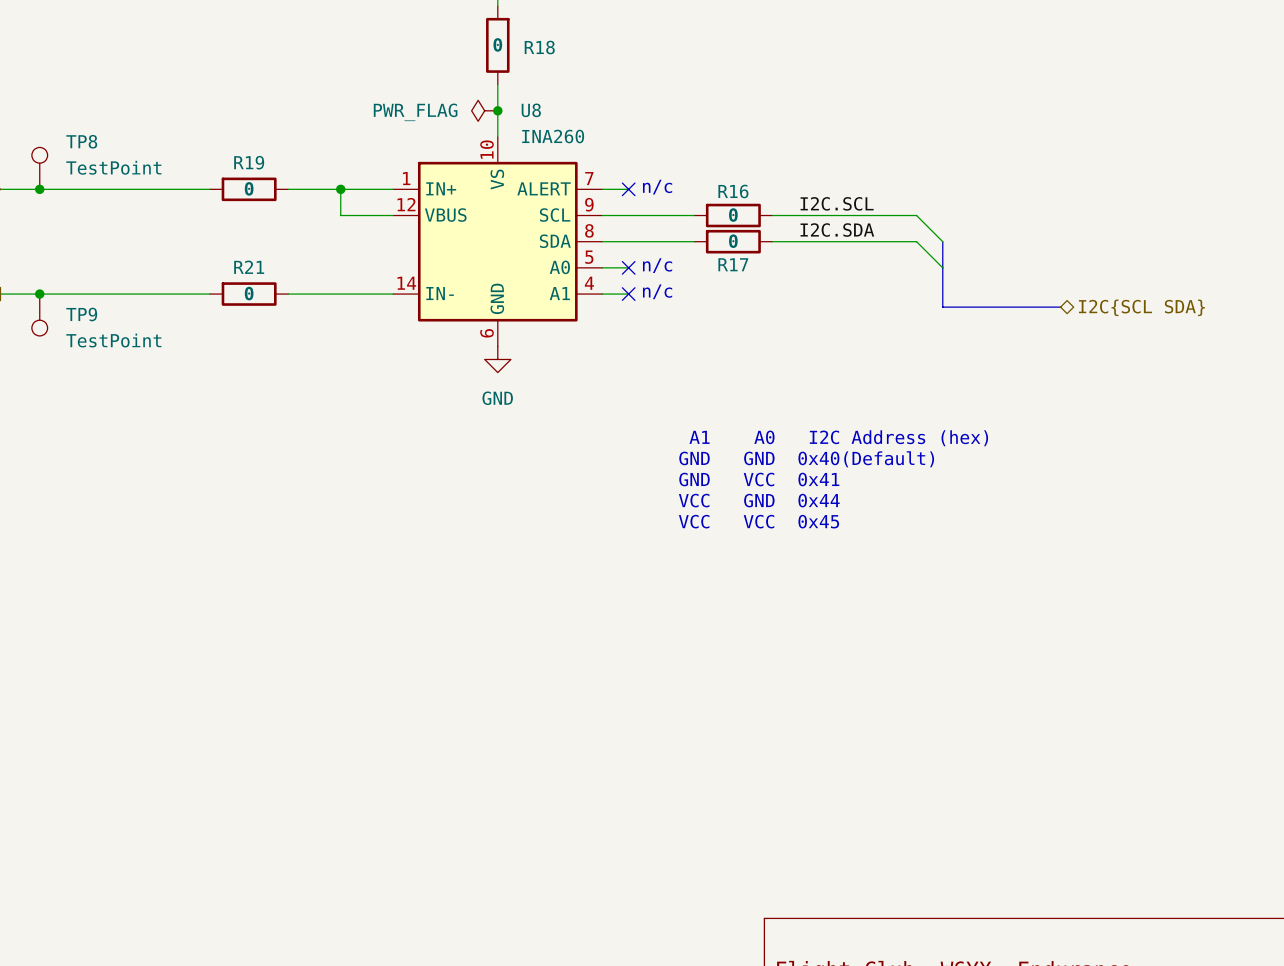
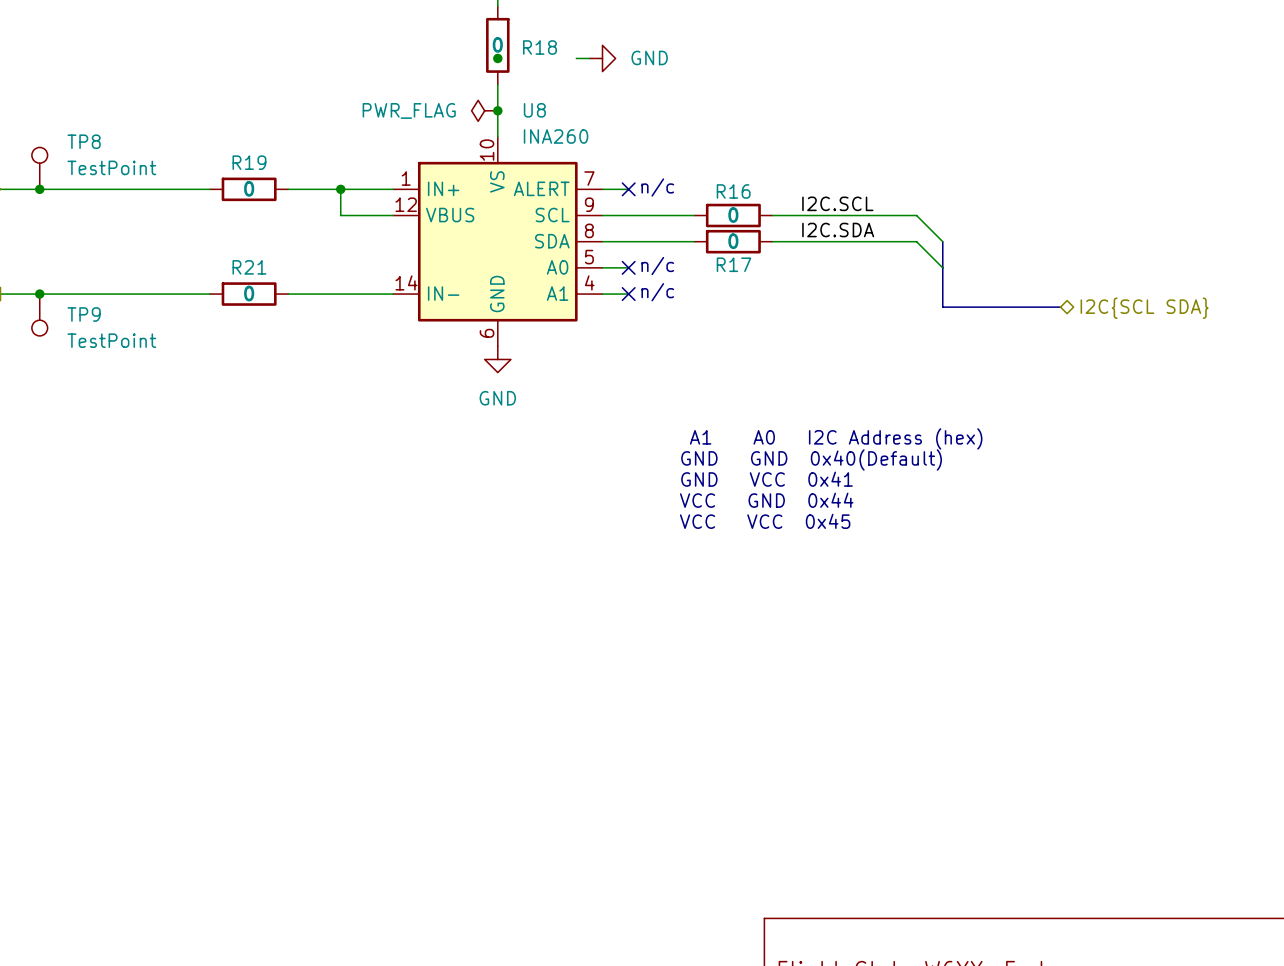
junction: none -> (497, 58)
wire: none -> (576, 58) (589, 58)
power symbol: none -> GND (602, 58)

